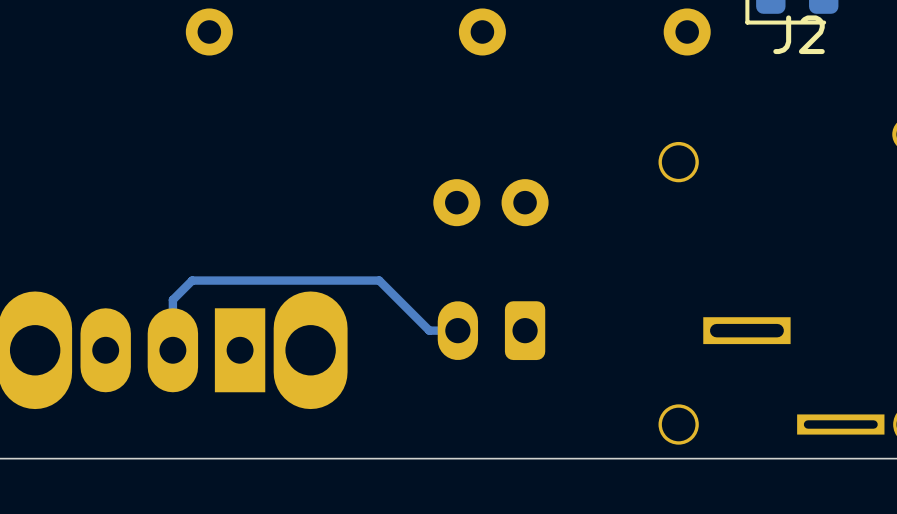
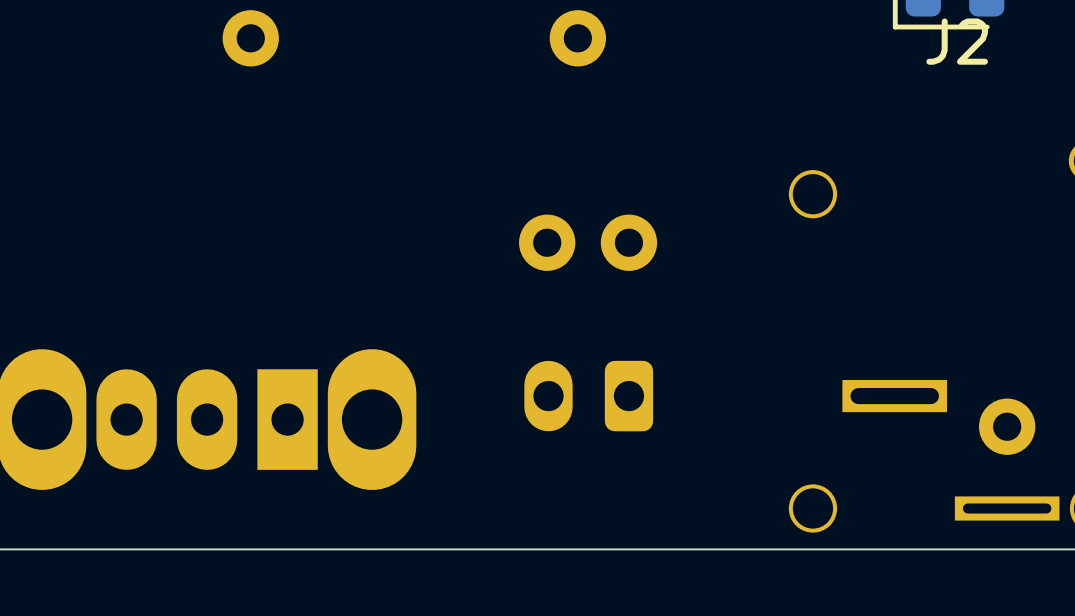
part position: (687, 31) -> (1007, 426)
track: (457, 330) (429, 330) (379, 280) (192, 280) (172, 299) (172, 350) -> none

